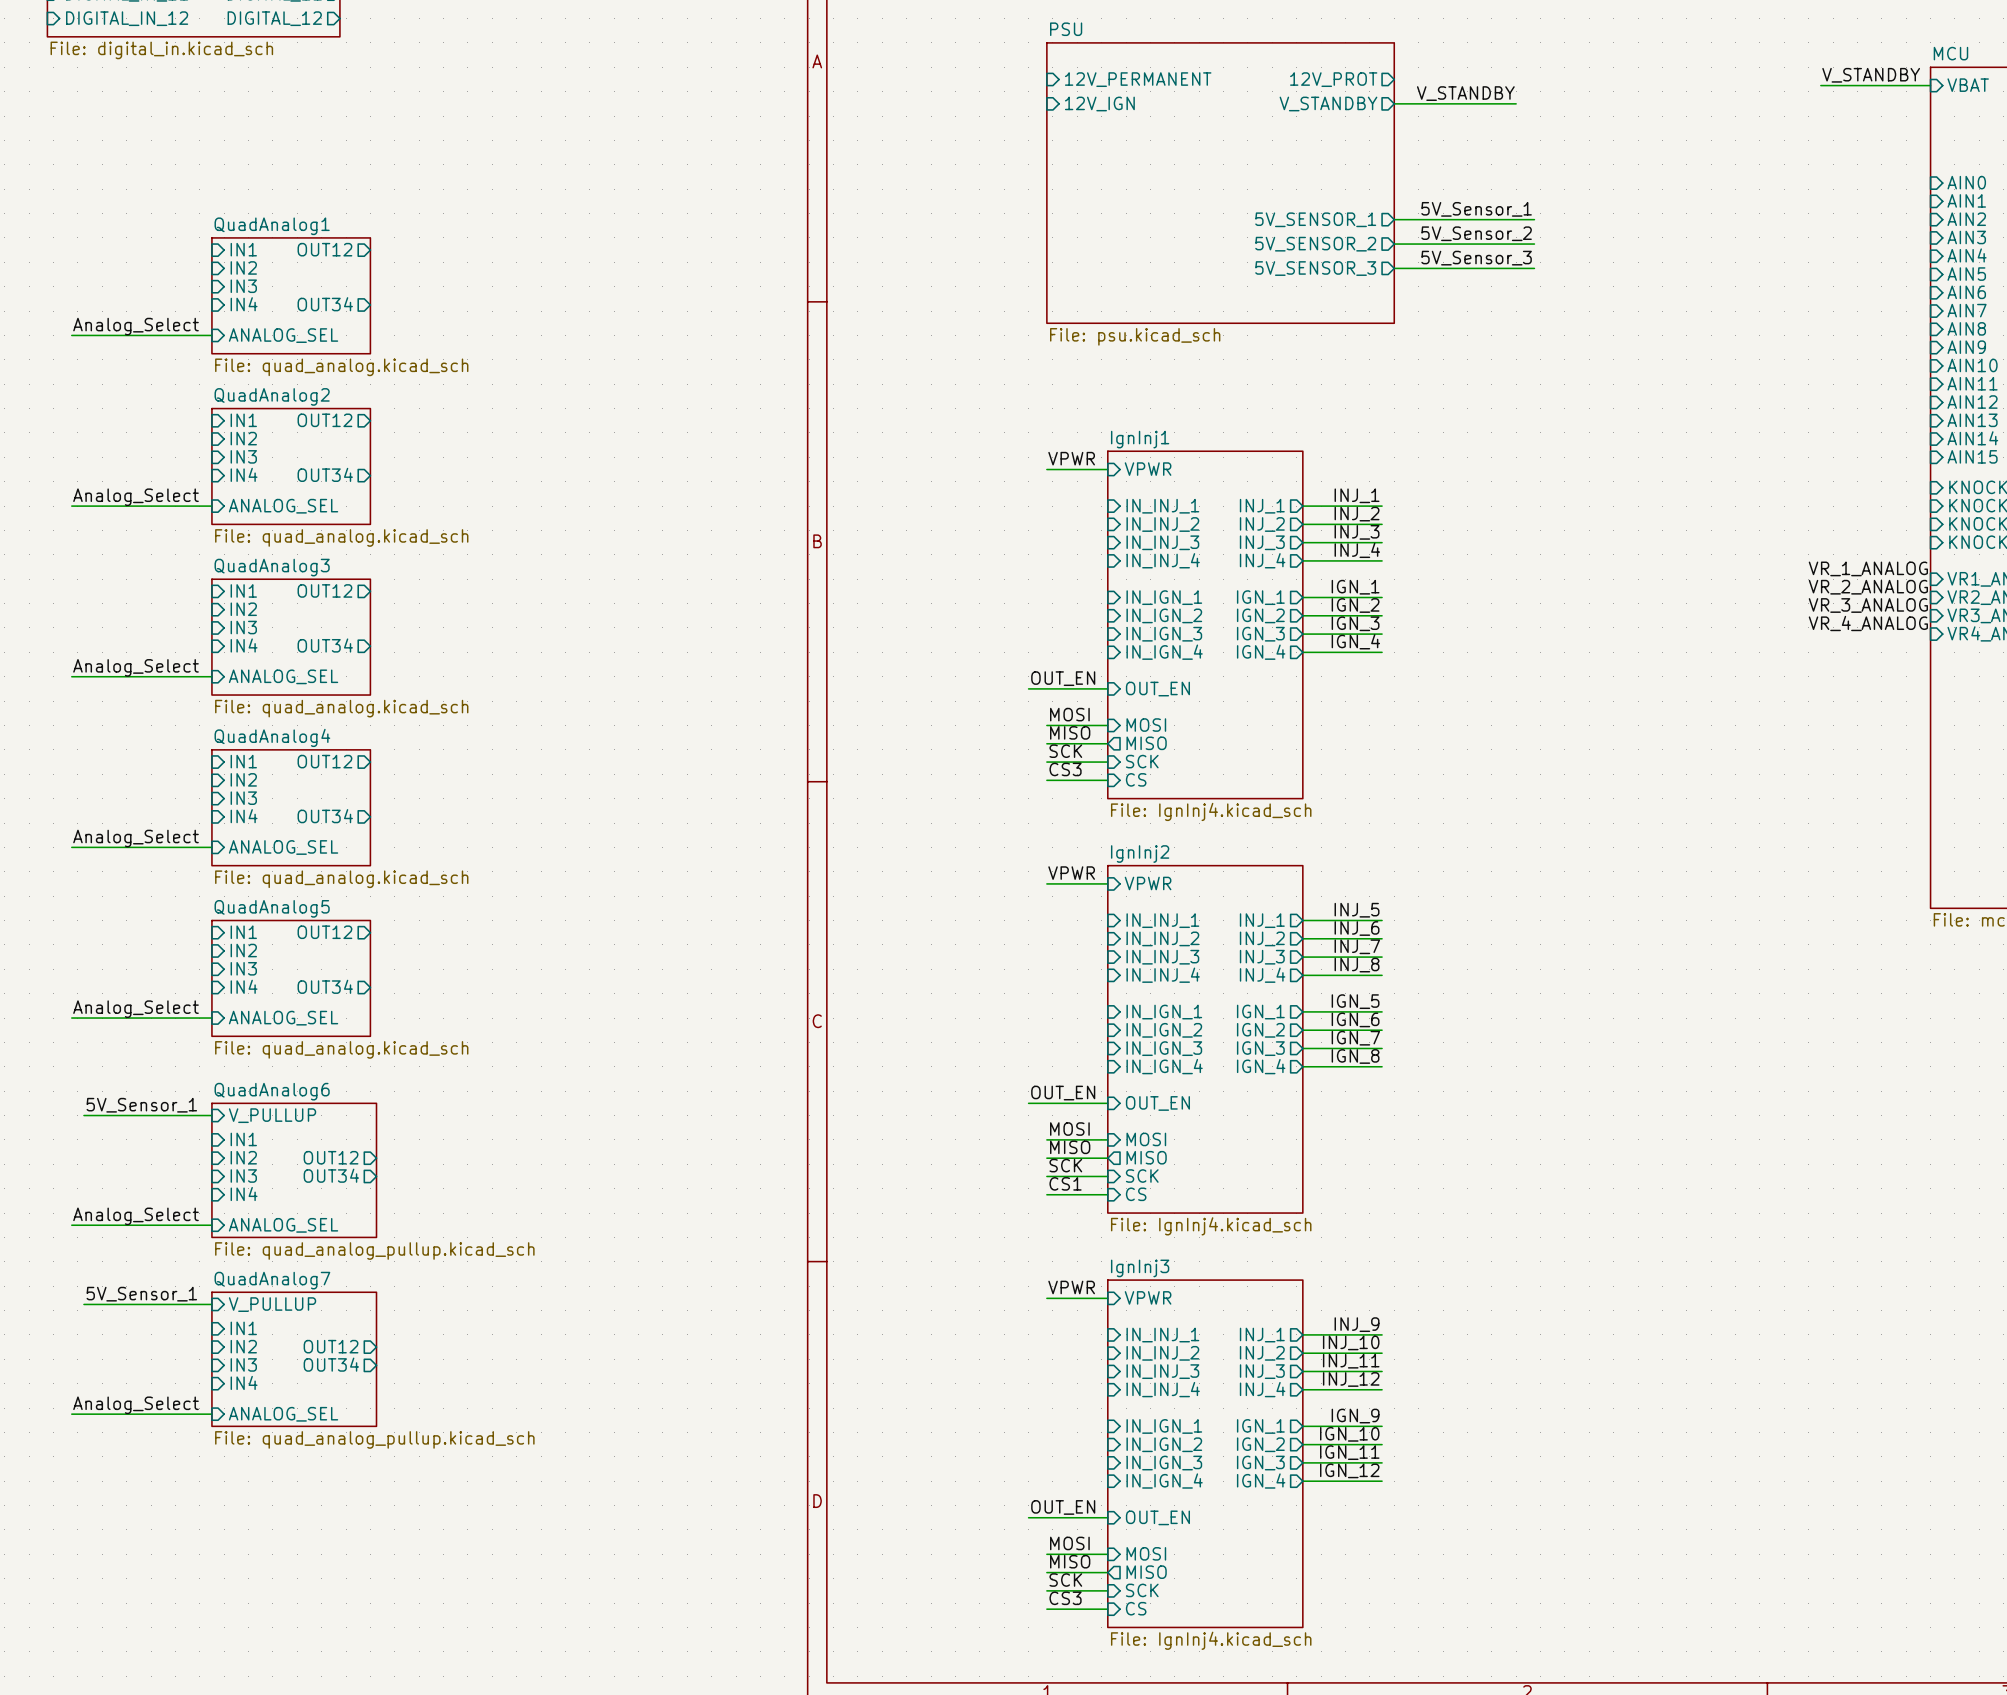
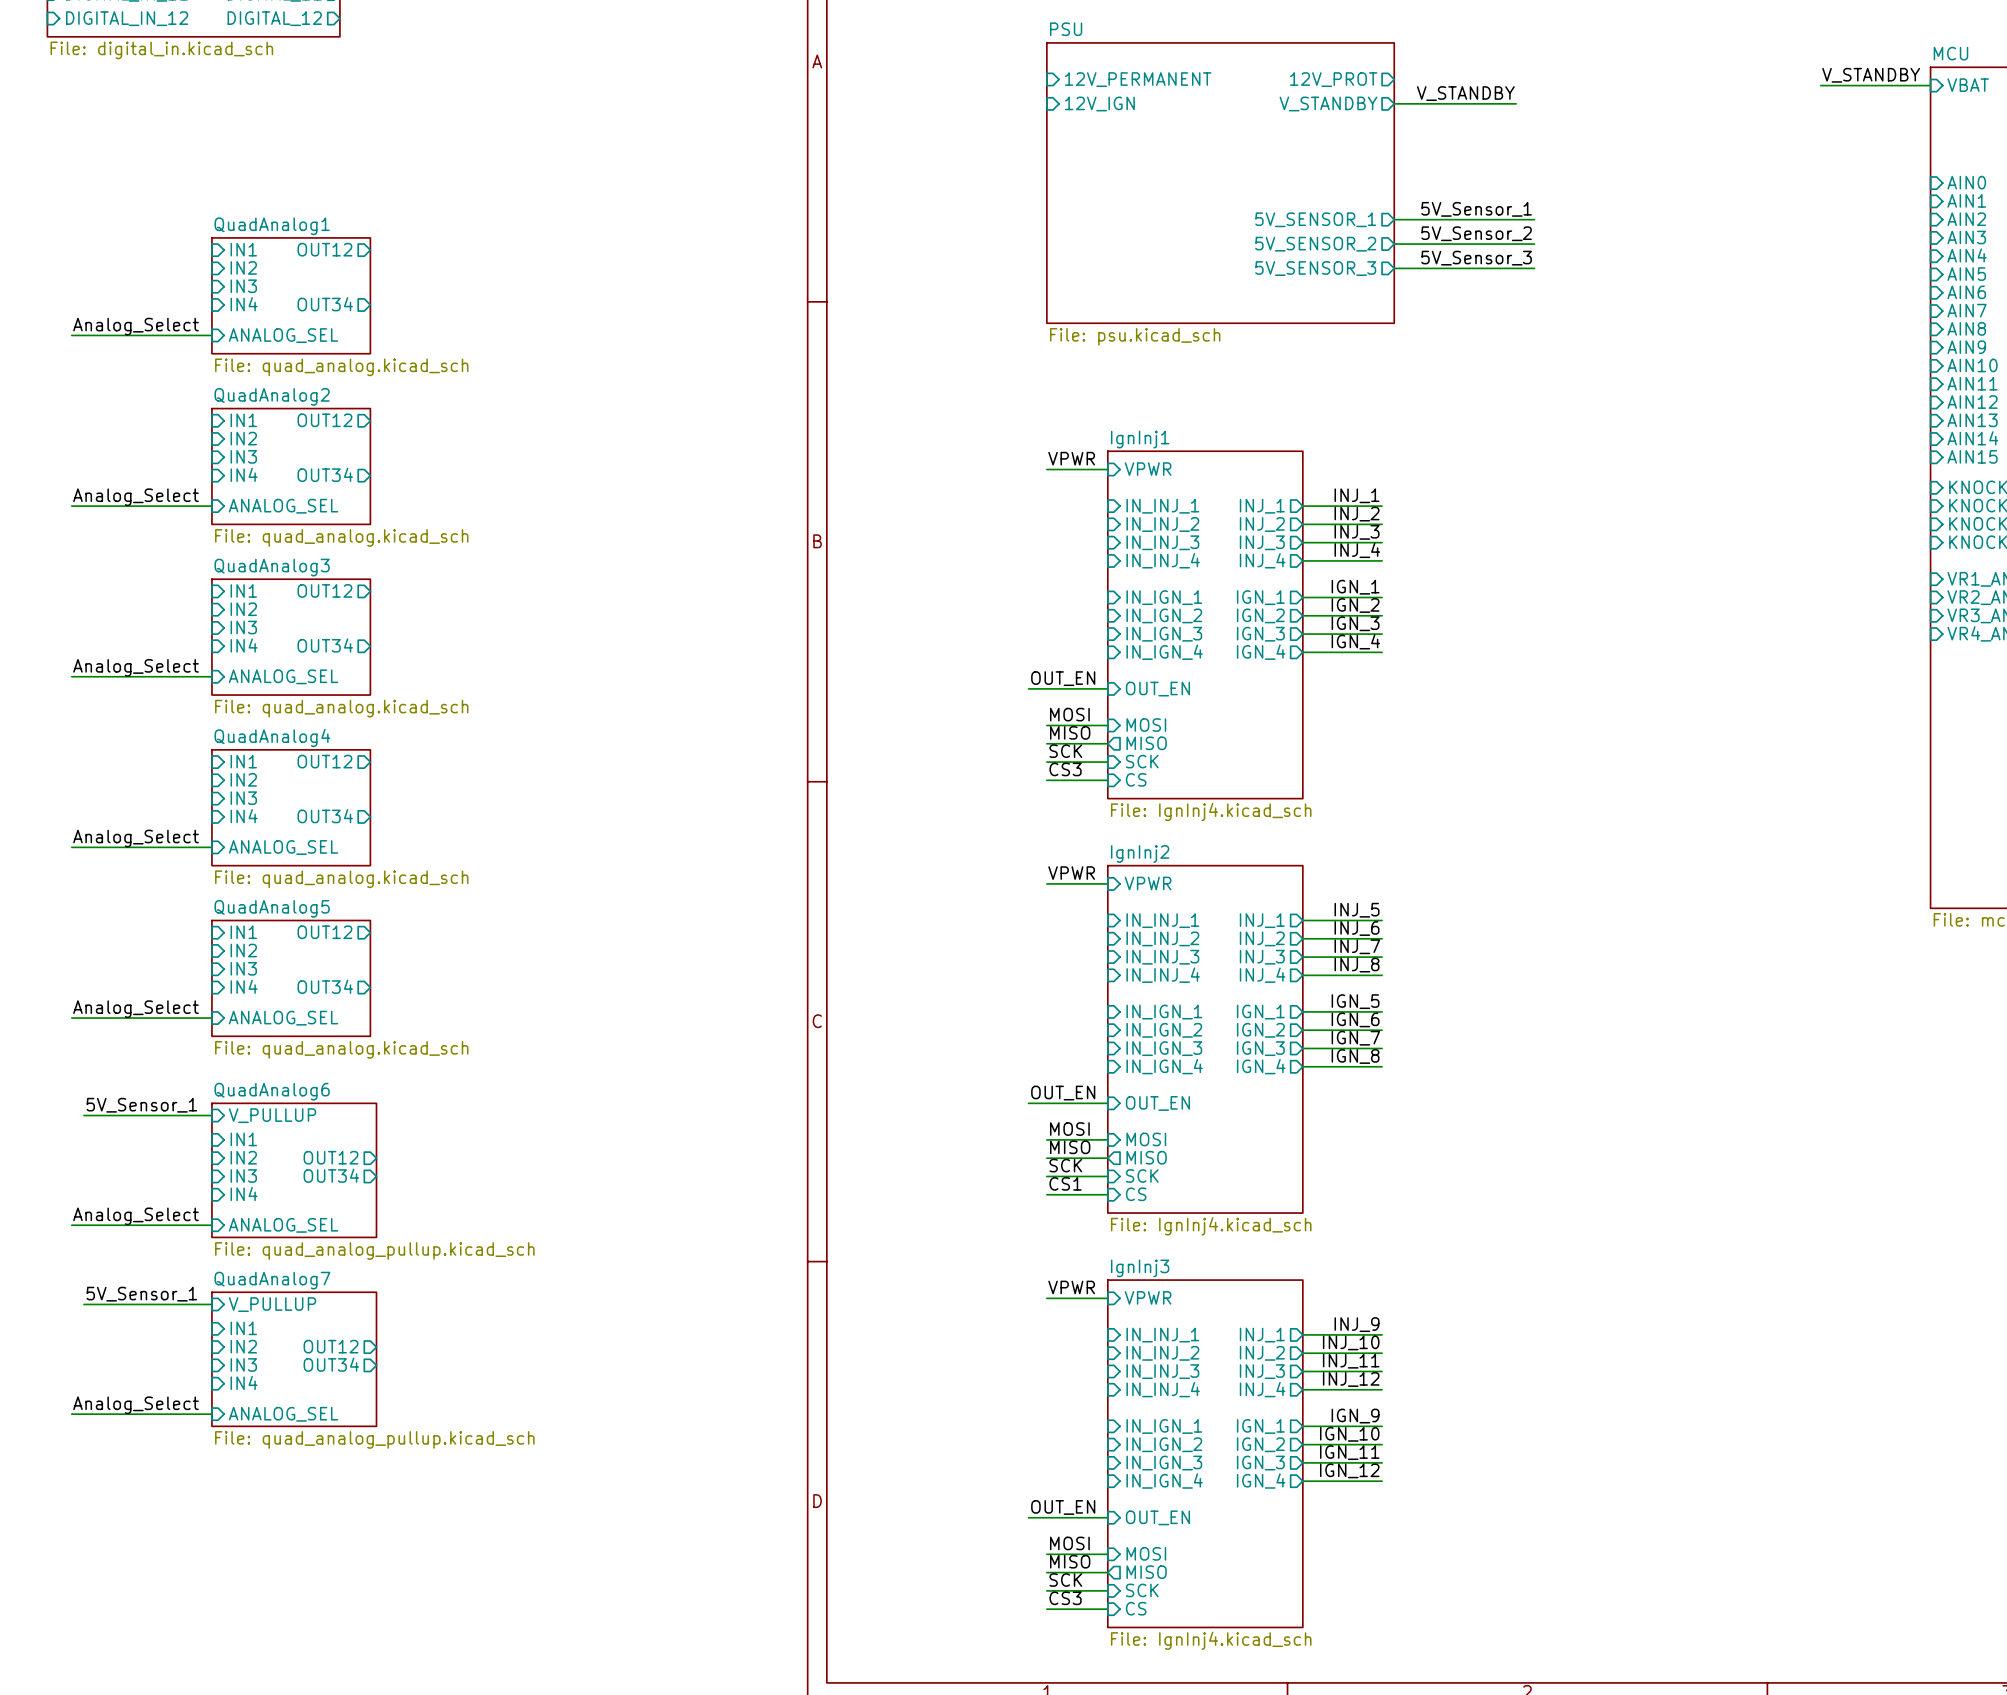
label: VR_1_ANALOG (1868, 568) -> none
label: VR_2_ANALOG (1868, 587) -> none
label: VR_3_ANALOG (1868, 605) -> none
label: VR_4_ANALOG (1868, 623) -> none

